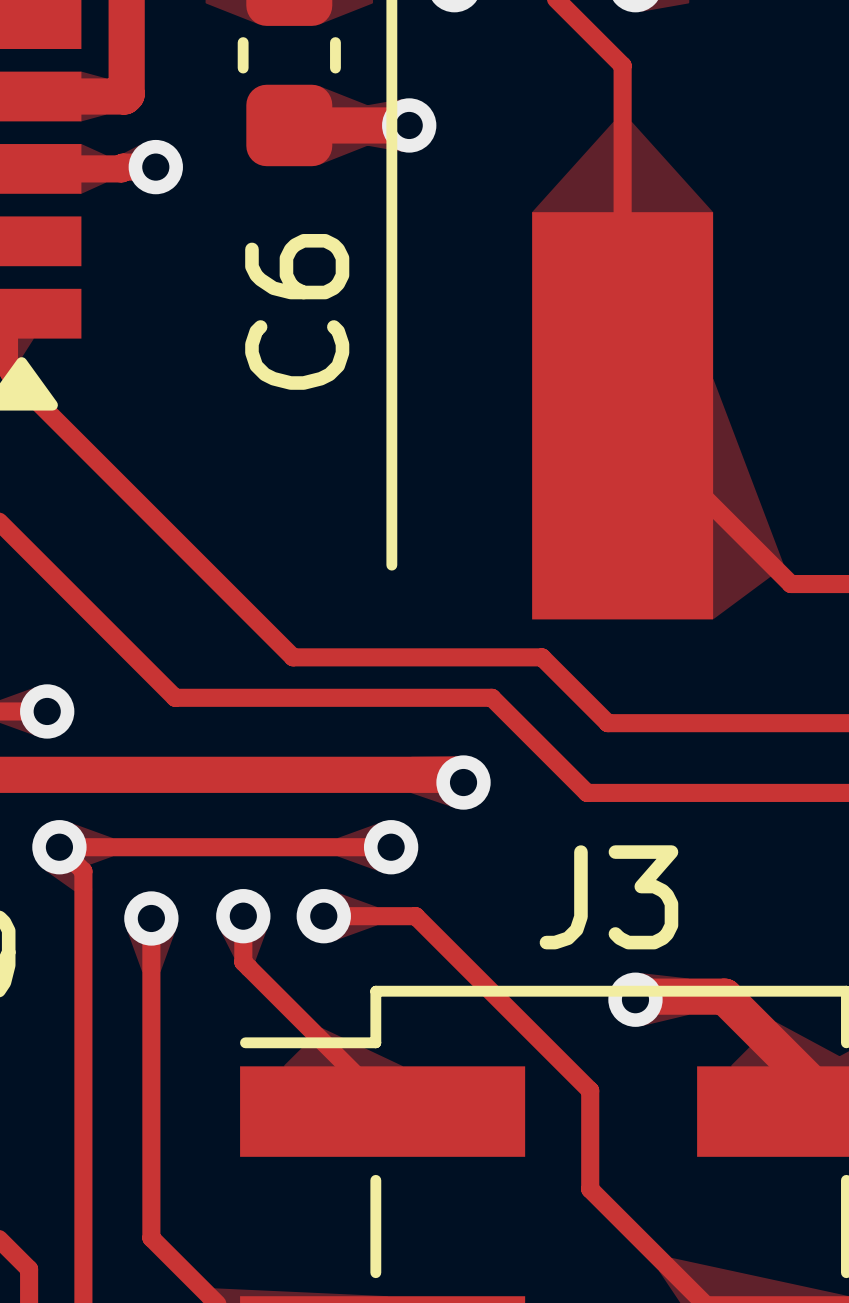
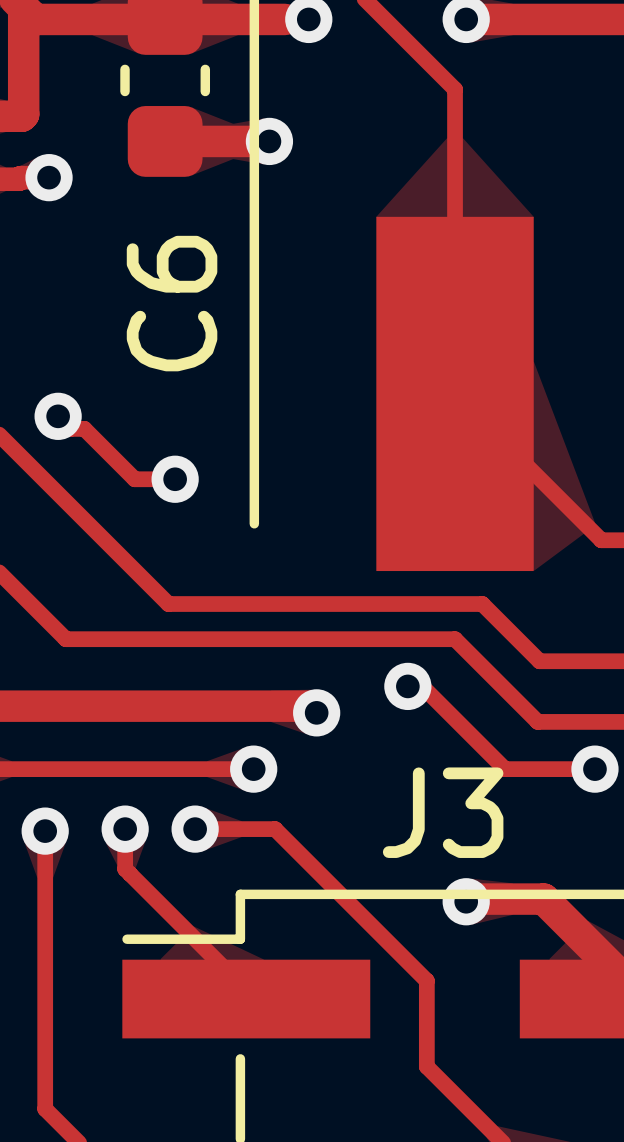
track: none -> (58, 416) (70, 428) (84, 428) (134, 479) (175, 479)
via: none -> (58, 416)
via: none -> (175, 479)
track: (542, 657) (607, 723) (719, 723) -> (384, 604) (482, 604) (539, 661)
track: (491, 697) (587, 792) (717, 792) -> (341, 639) (455, 639) (537, 721)
track: none -> (407, 686) (422, 686) (505, 769) (594, 769)
via: none -> (407, 686)
via: none -> (594, 769)

